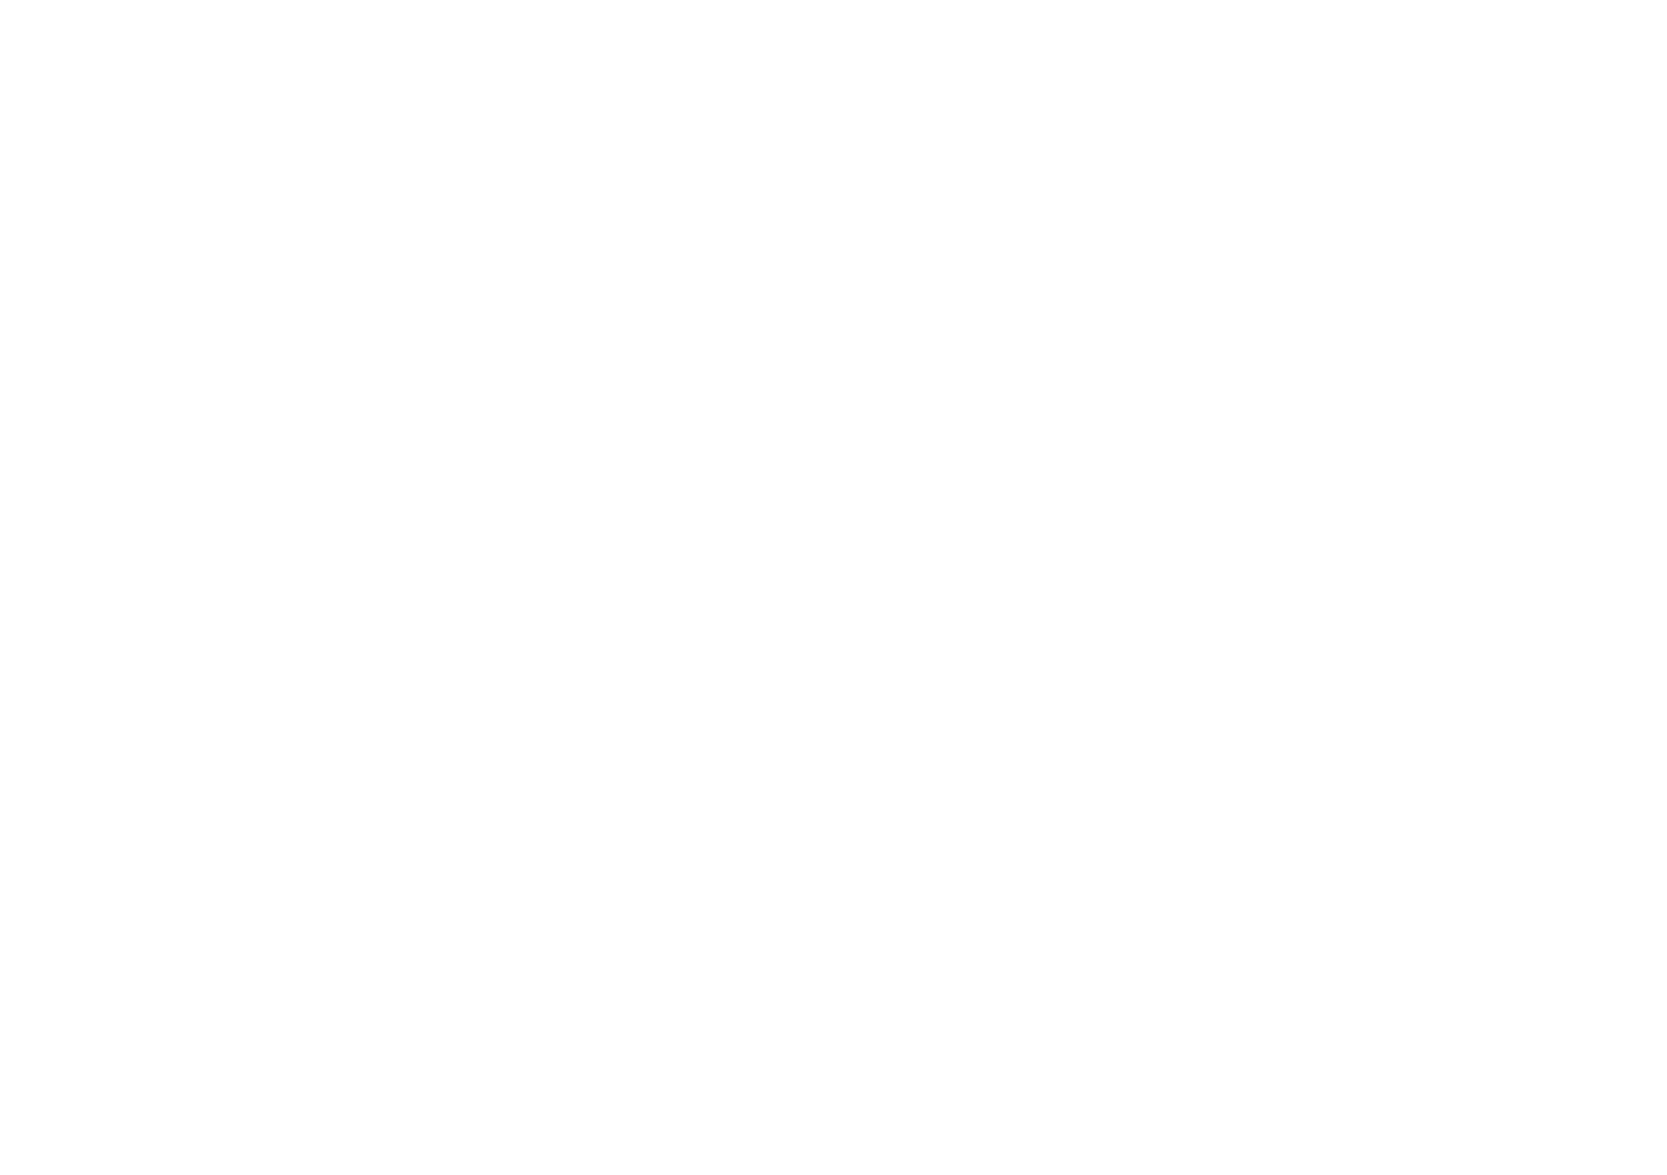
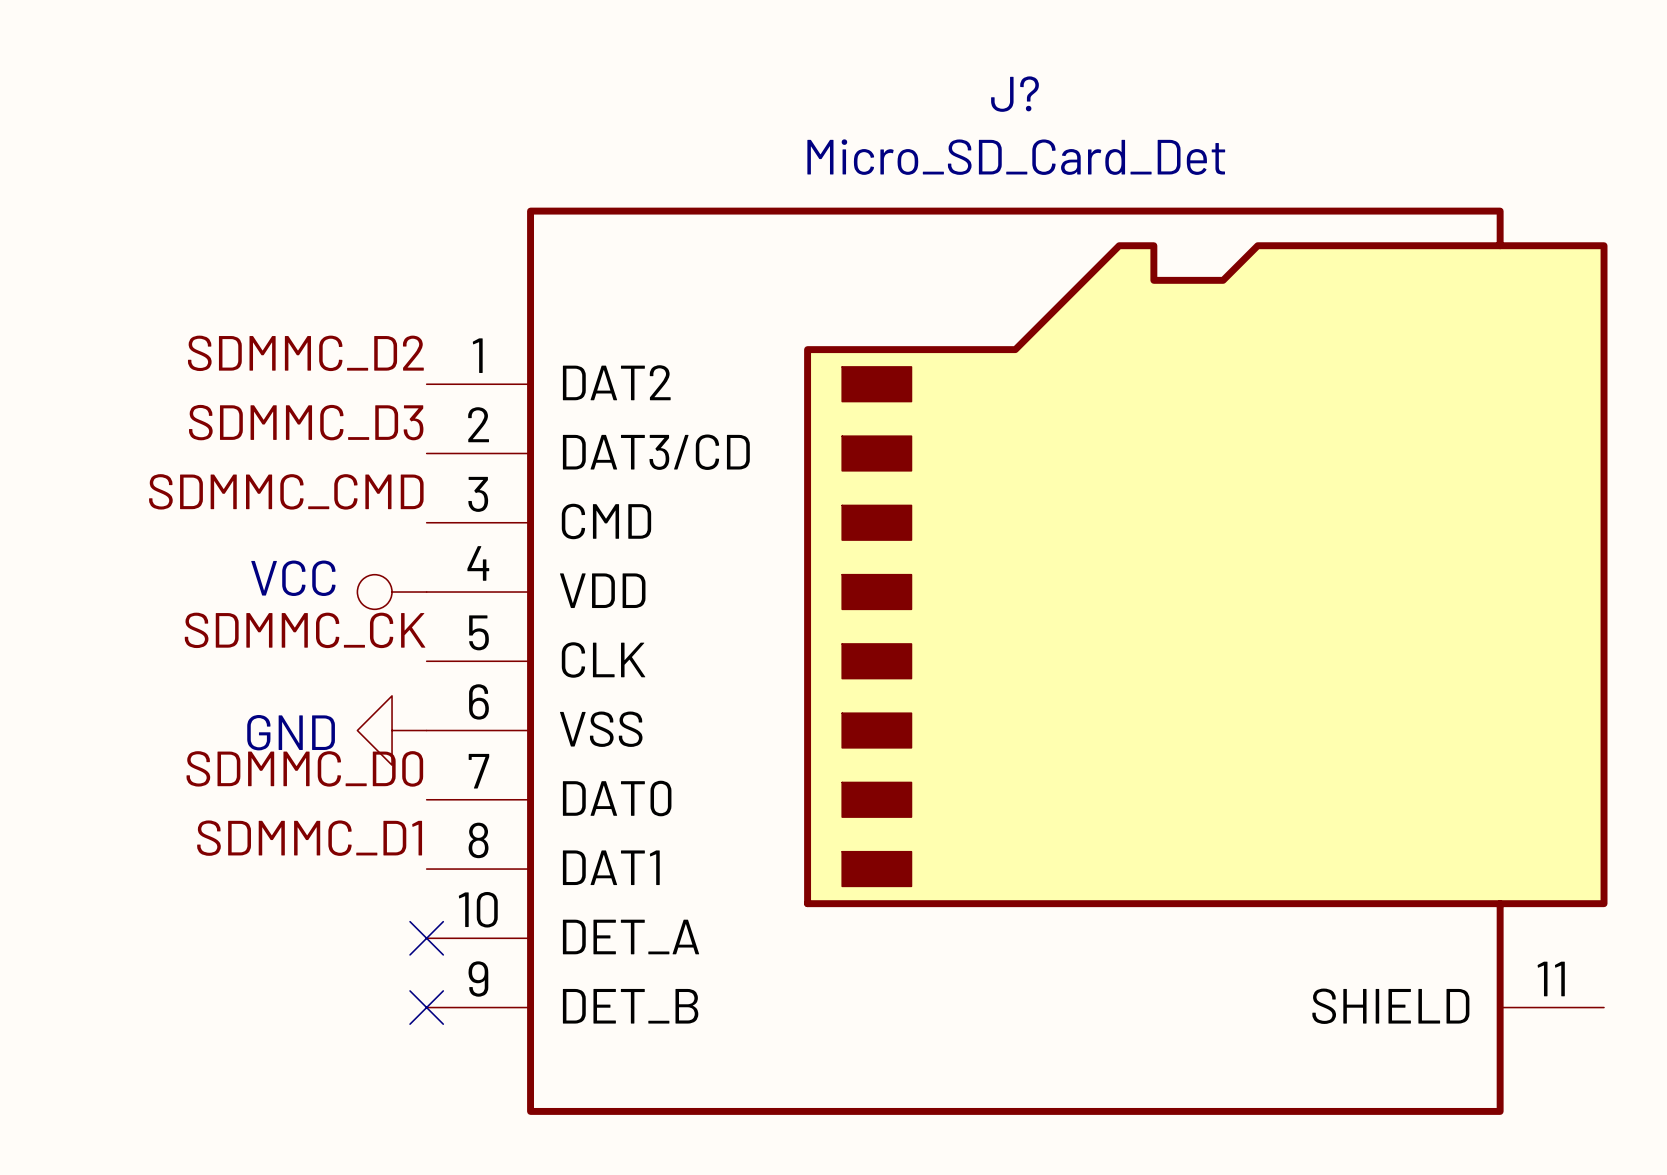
label: none -> SDMMC_D2 (305, 353)
label: none -> SDMMC_D3 (306, 422)
label: none -> SDMMC_CMD (286, 491)
power symbol: none -> VCC (392, 592)
label: none -> SDMMC_CK (305, 630)
J?: none -> Micro_SD_Card_Det (1017, 661)
power symbol: none -> GND (392, 730)
label: none -> SDMMC_D0 (304, 768)
label: none -> SDMMC_D1 (309, 838)
no-connect mark: none -> (426, 938)
no-connect mark: none -> (426, 1007)

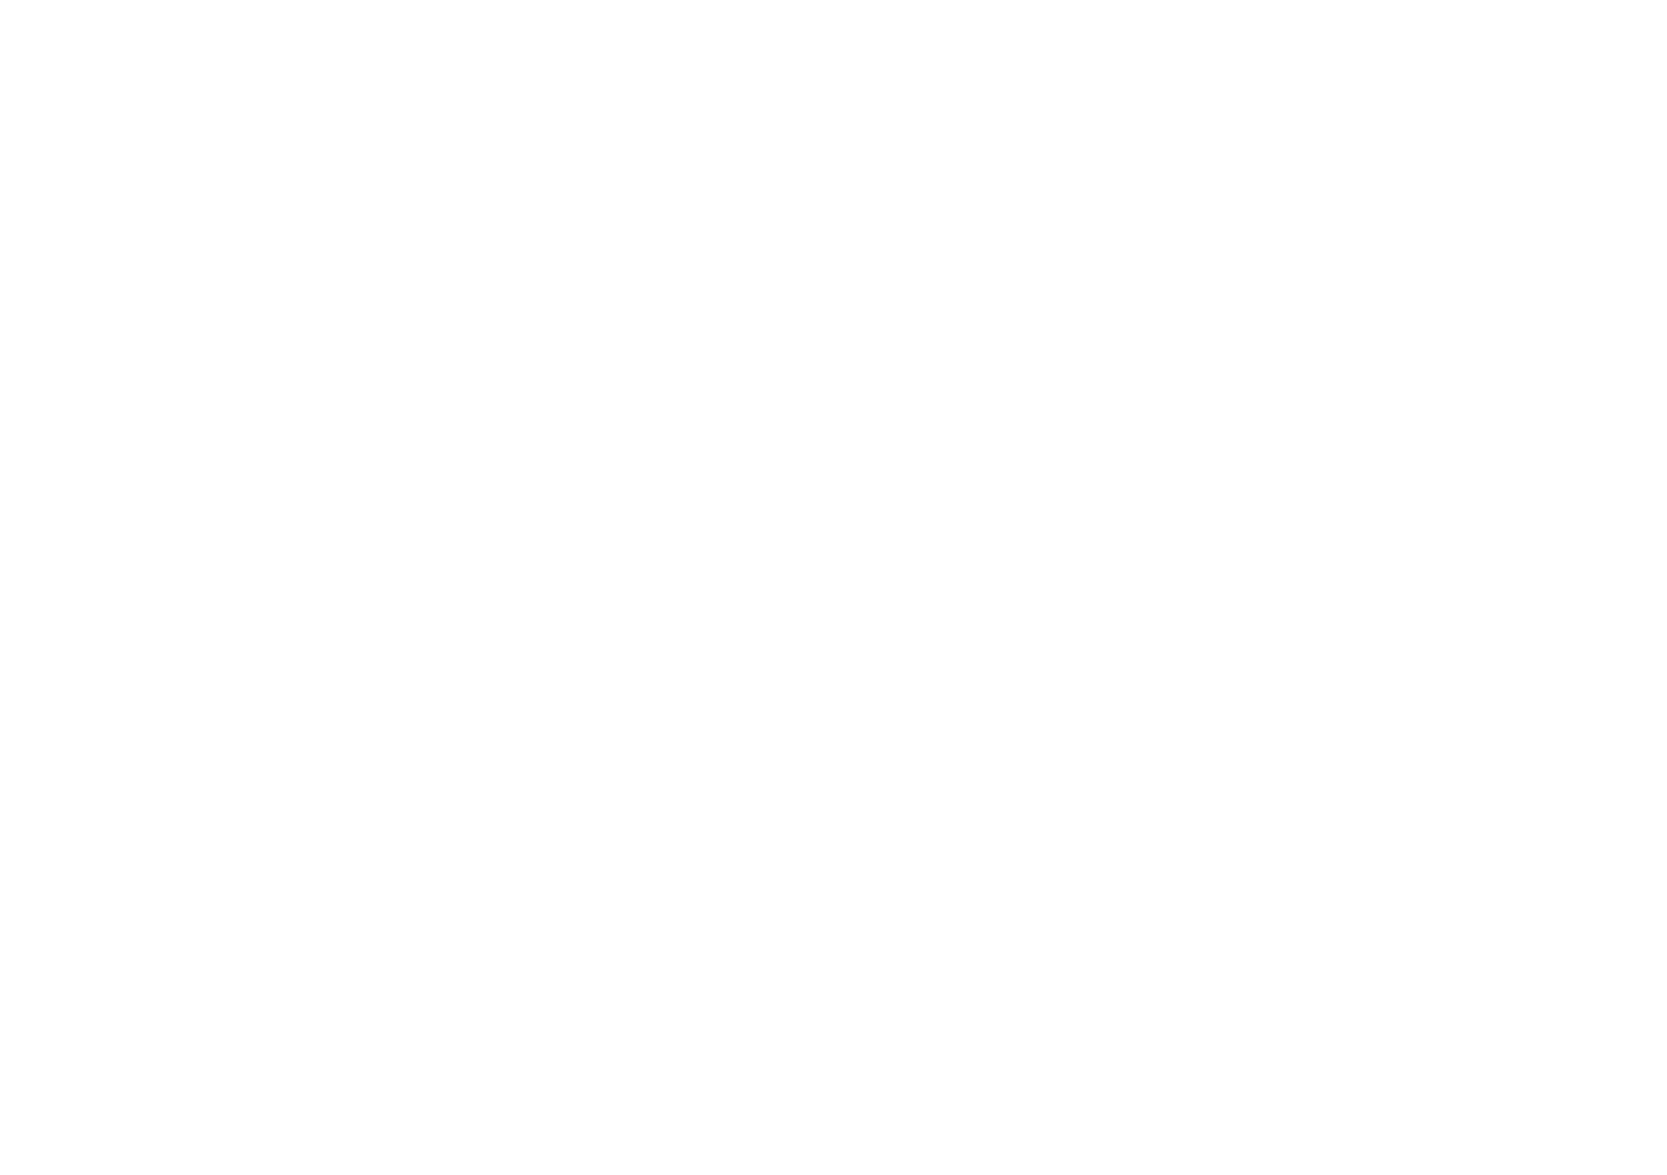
label: SDMMC_D2 (305, 353) -> none
label: SDMMC_D3 (306, 422) -> none
label: SDMMC_CMD (286, 491) -> none
power symbol: VCC (392, 592) -> none
label: SDMMC_CK (305, 630) -> none
J?: Micro_SD_Card_Det (1017, 661) -> none
power symbol: GND (392, 730) -> none
label: SDMMC_D0 (304, 768) -> none
label: SDMMC_D1 (309, 838) -> none
no-connect mark: (426, 938) -> none
no-connect mark: (426, 1007) -> none

